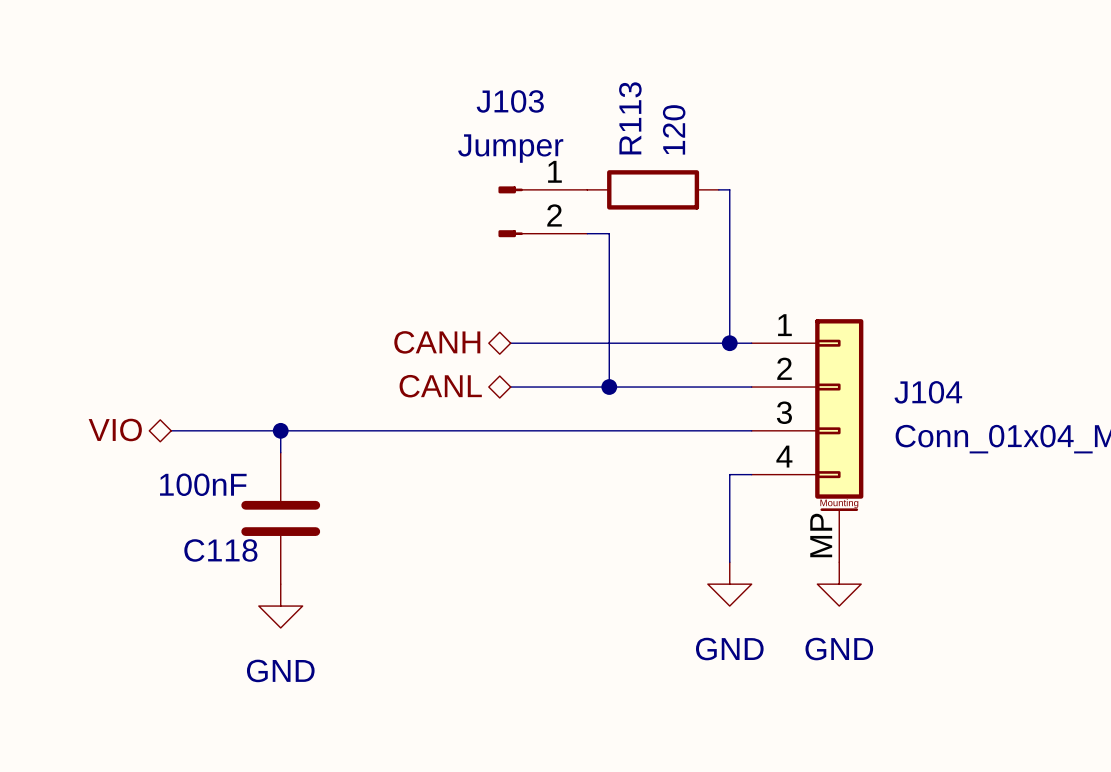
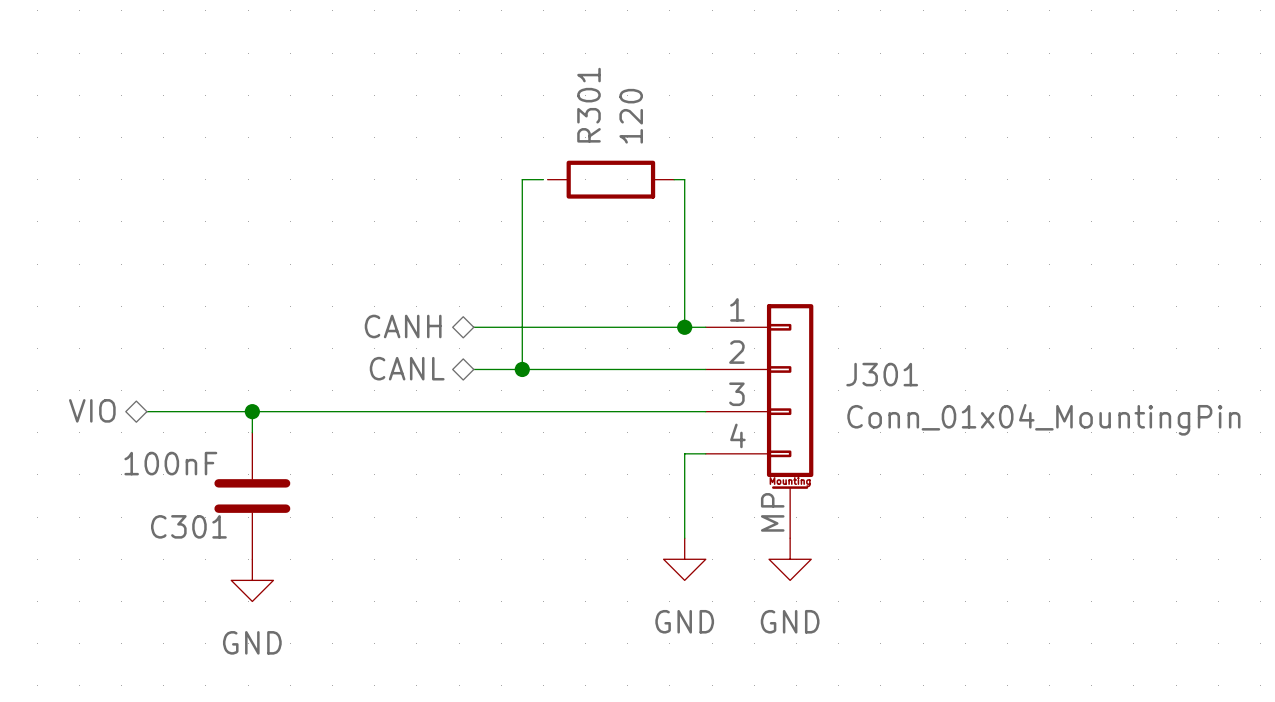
R113 name: R113 (630, 118) -> R301 (589, 105)
wire: none -> (543, 179) (522, 179) (522, 369)
J103: Jumper (542, 211) -> none
wire: (587, 233) (609, 233) (609, 387) -> none
junction position: (609, 387) -> (522, 369)
J104 name: J104 (928, 392) -> J301 (882, 374)
C118 name: C118 (220, 550) -> C301 (188, 526)

